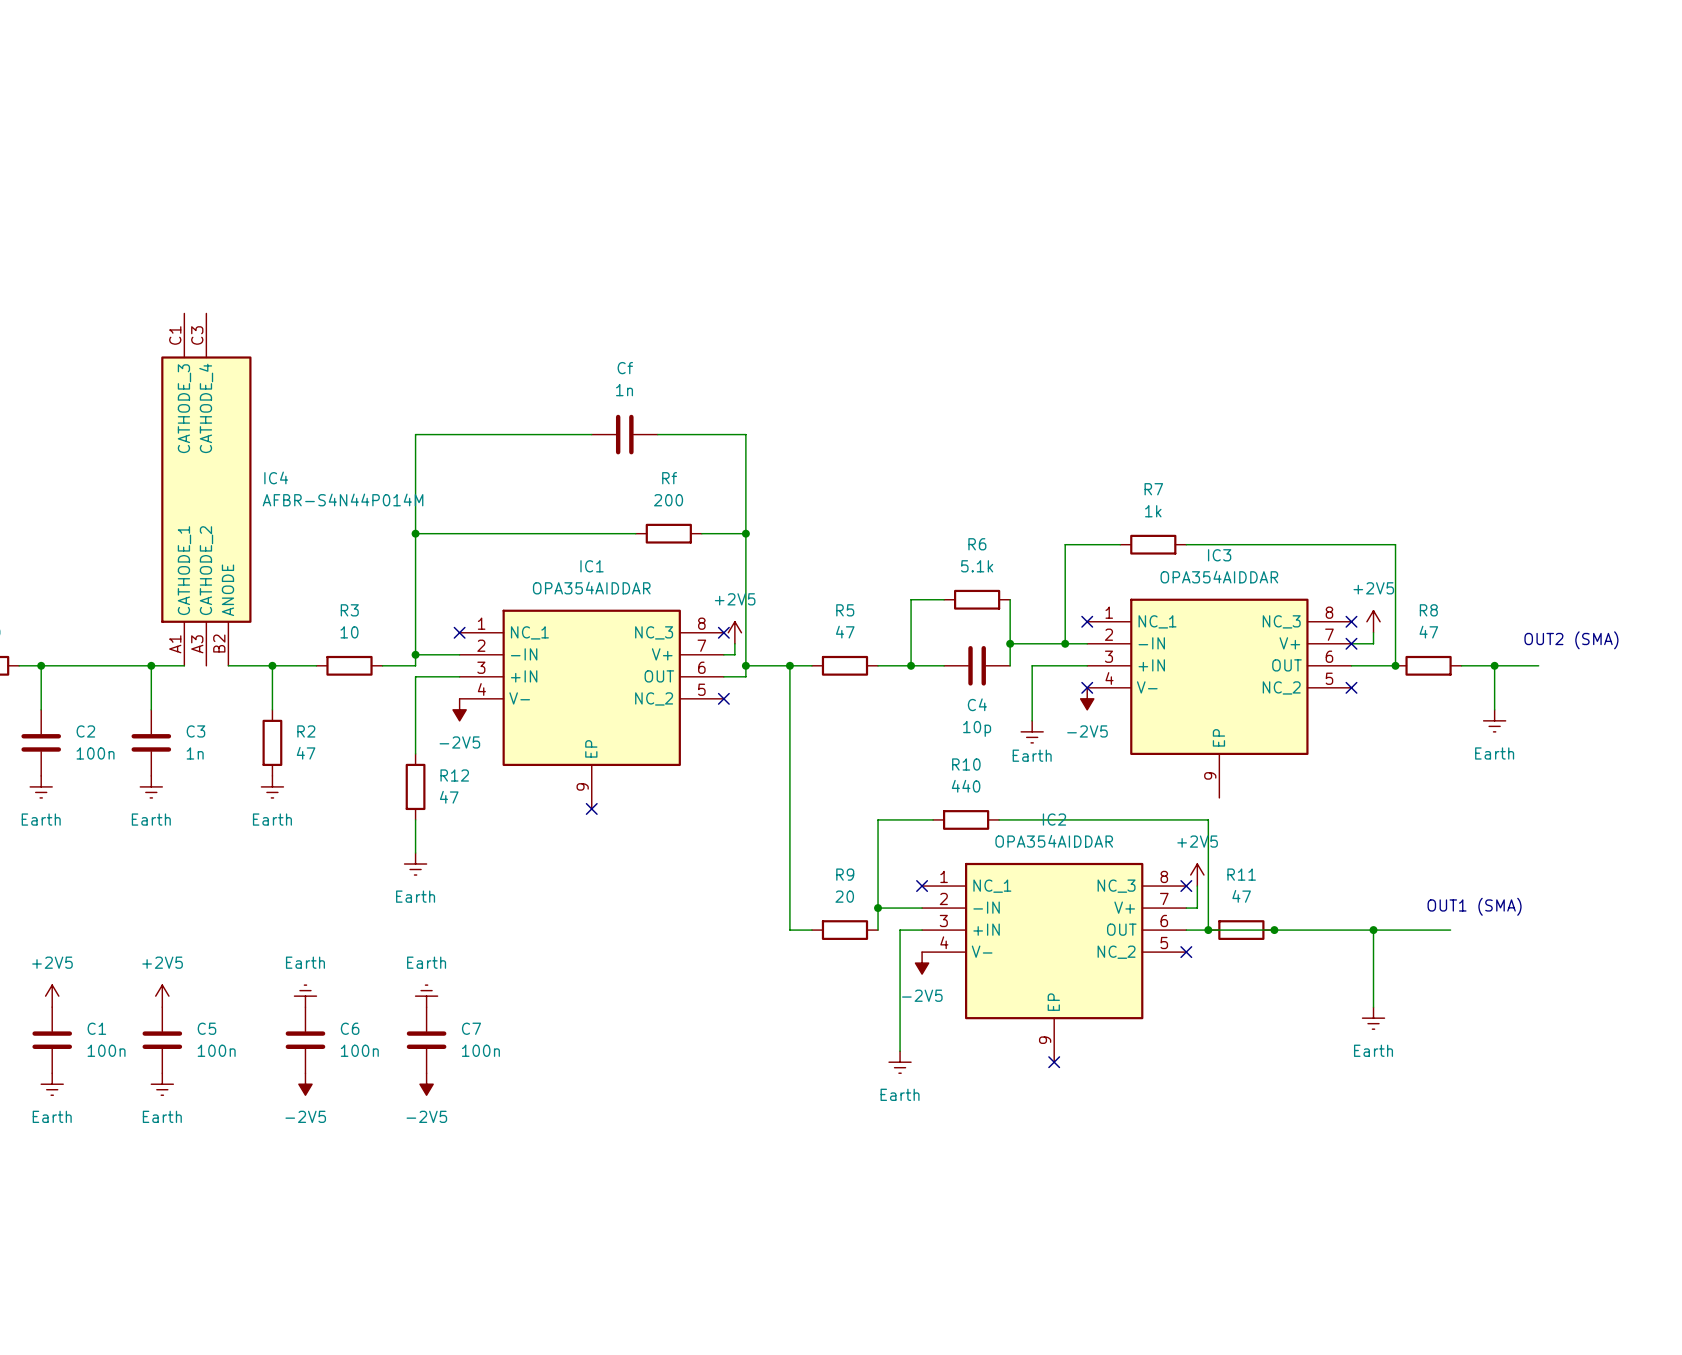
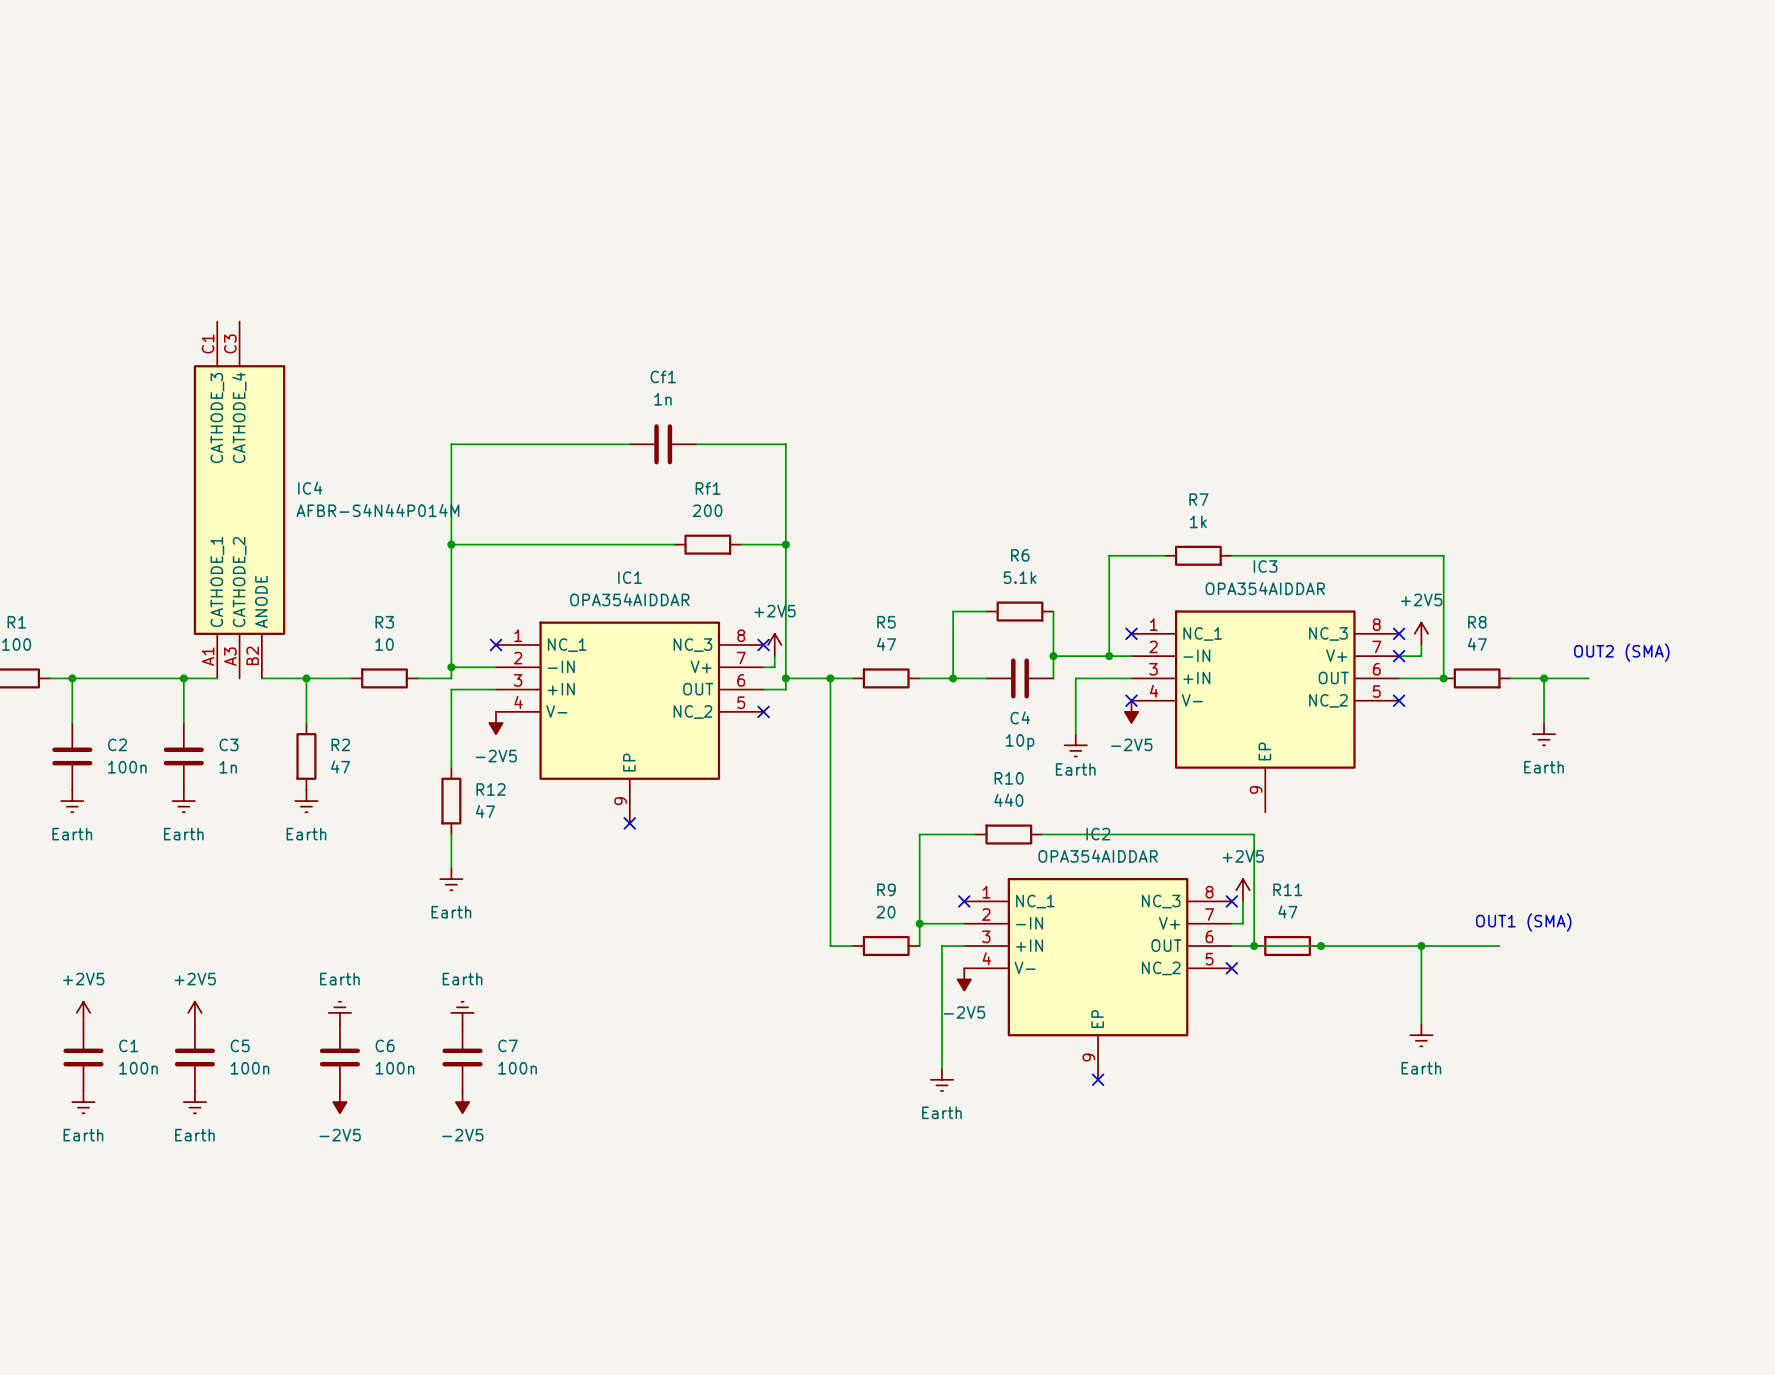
Cf name: Cf (625, 368) -> Cf1 (663, 376)
Rf name: Rf (669, 478) -> Rf1 (708, 488)

